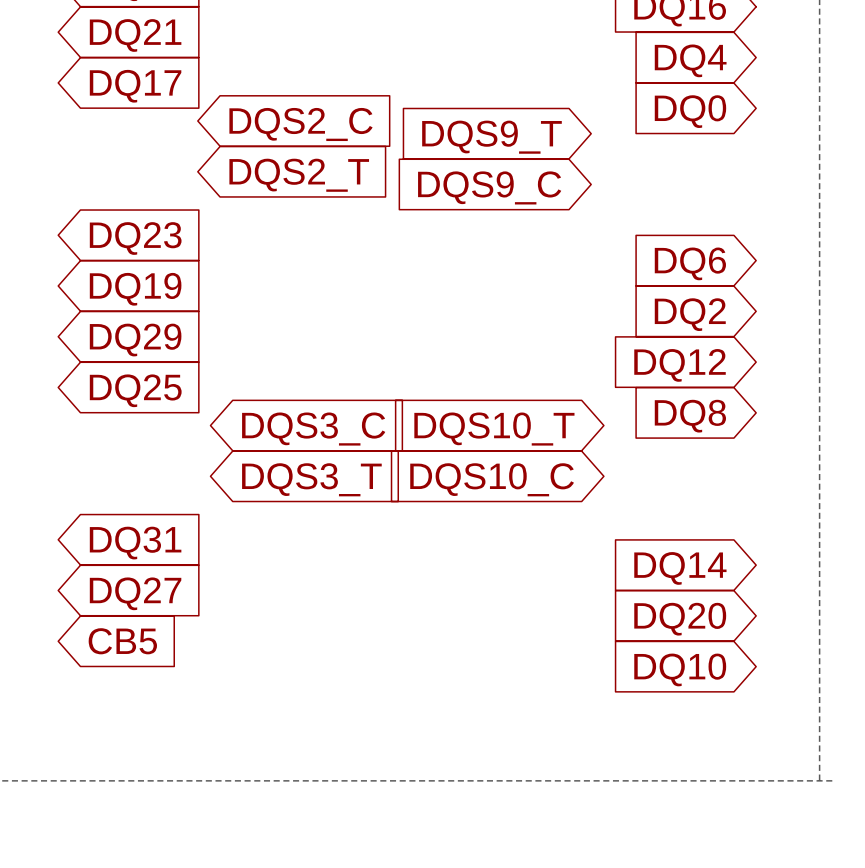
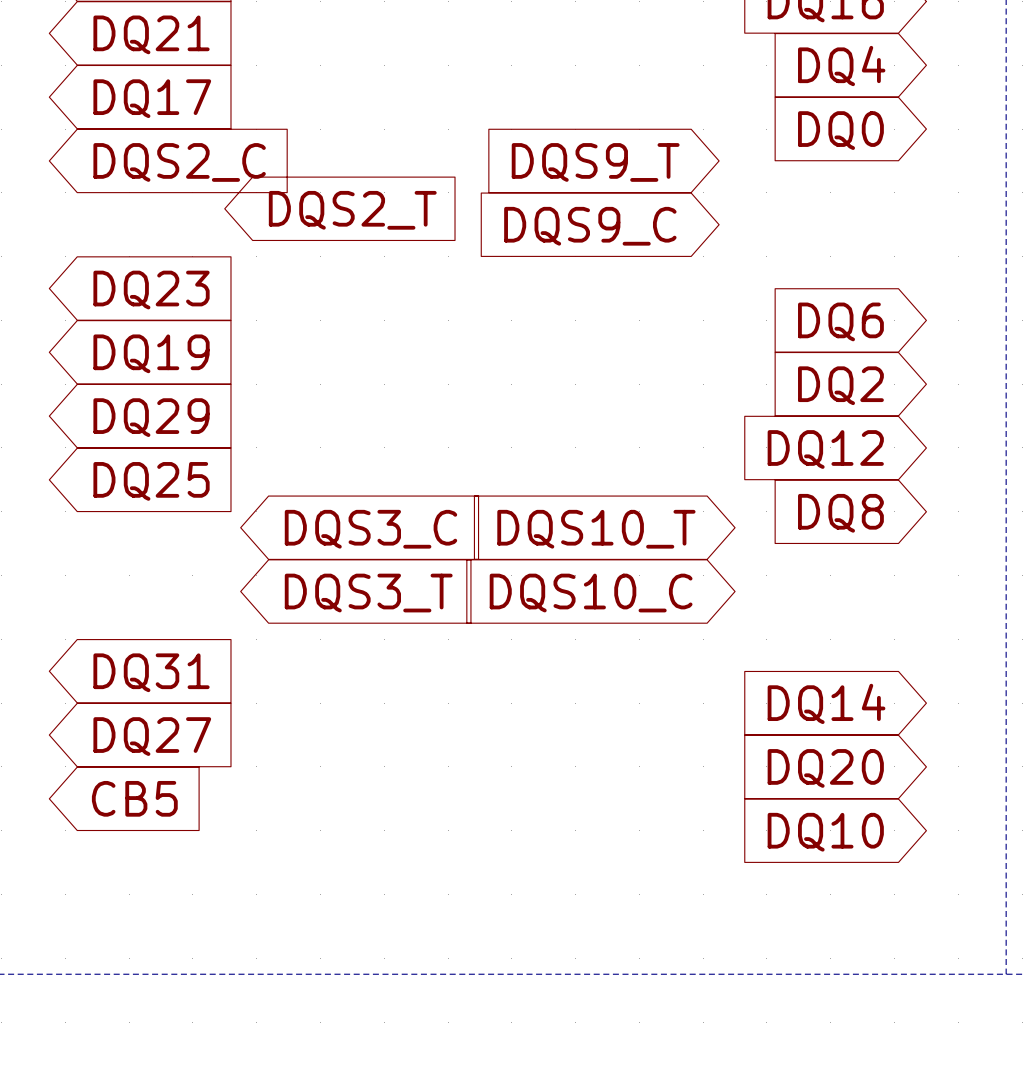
global label position: DQS2_C (300, 124) -> DQS2_C (179, 162)

